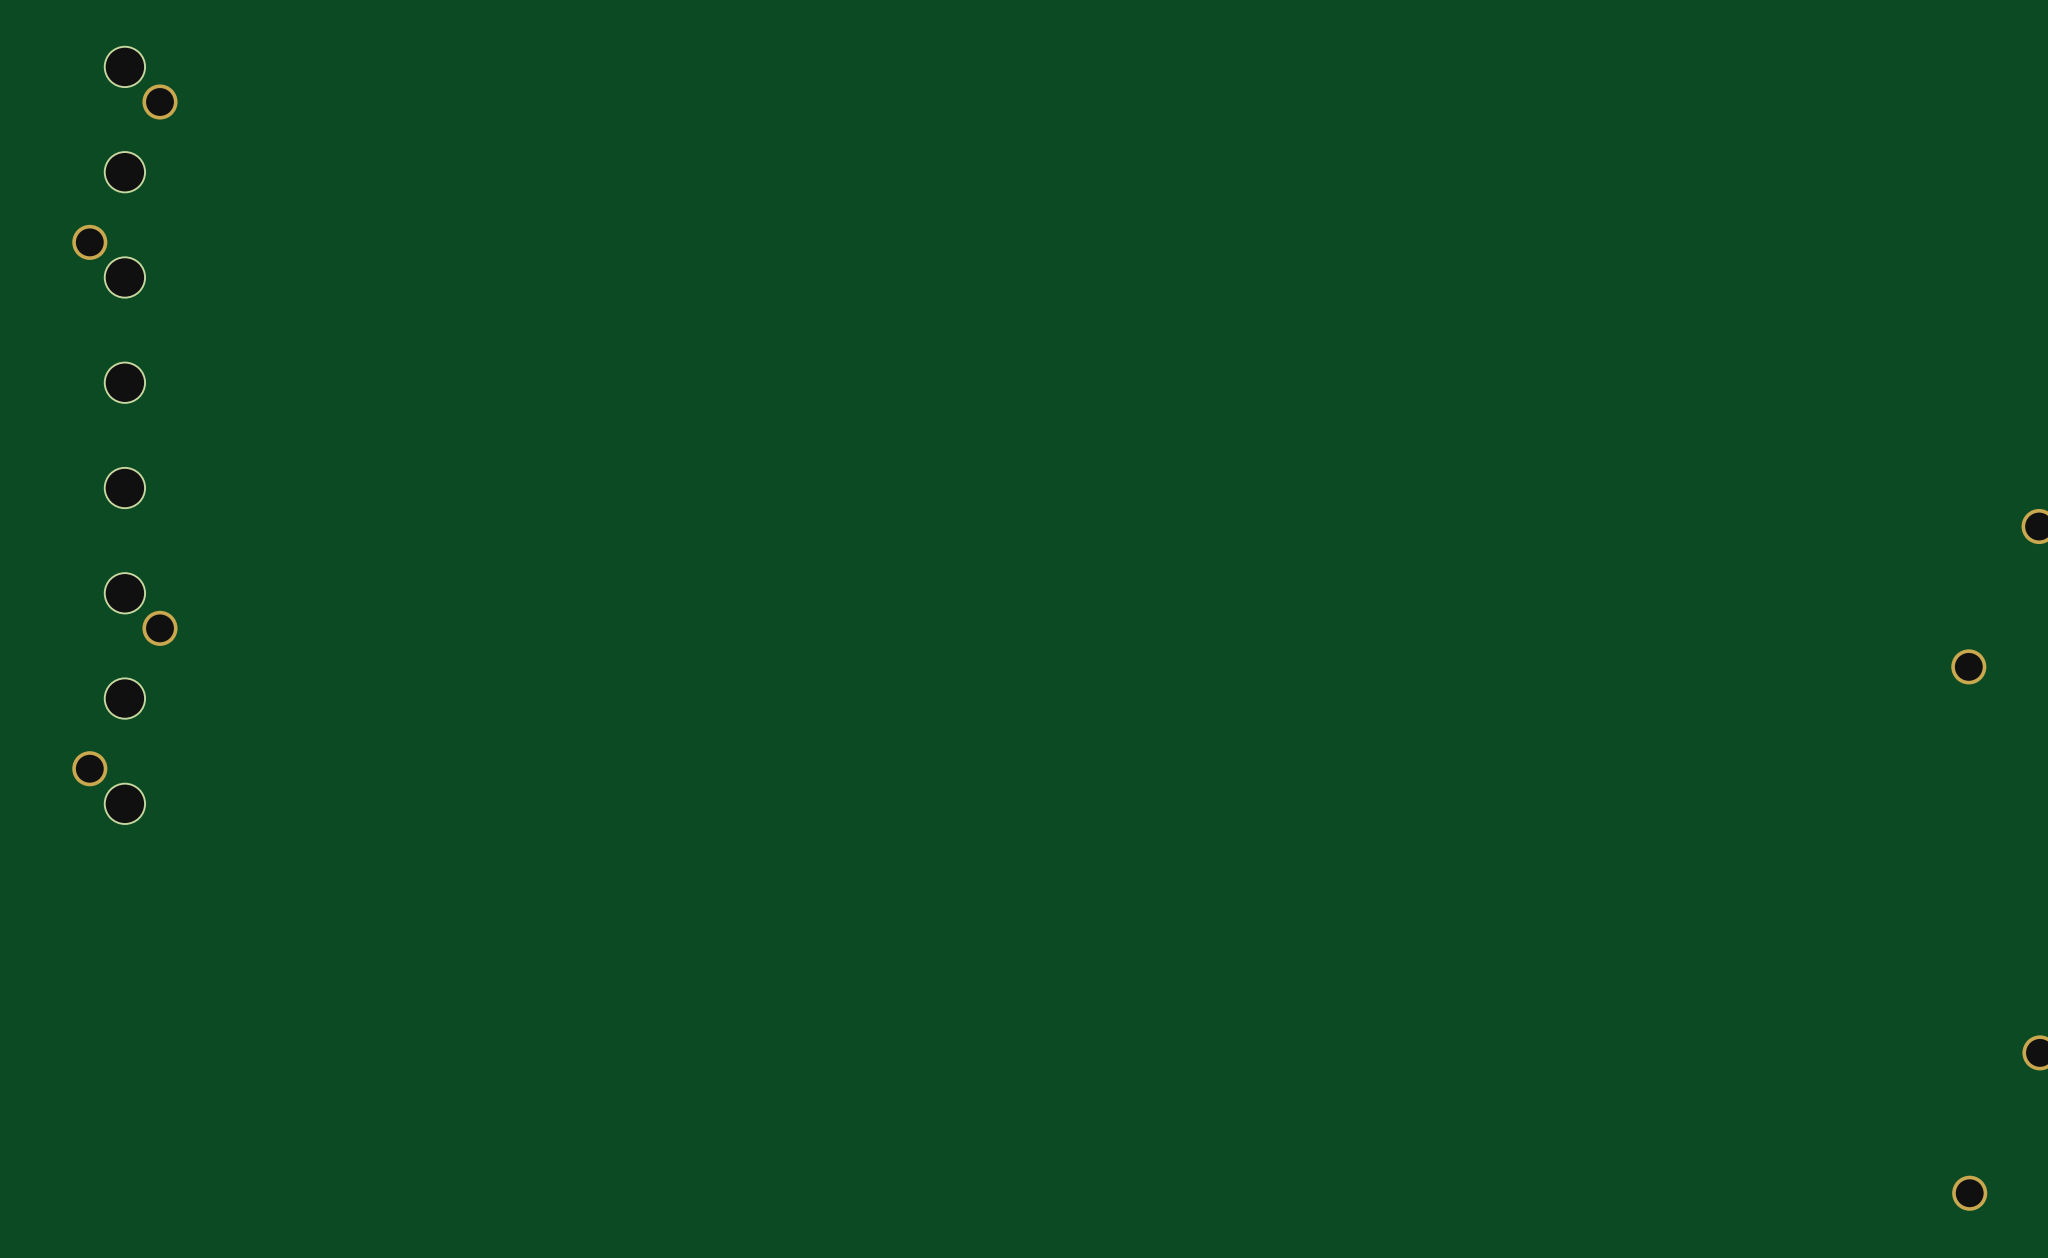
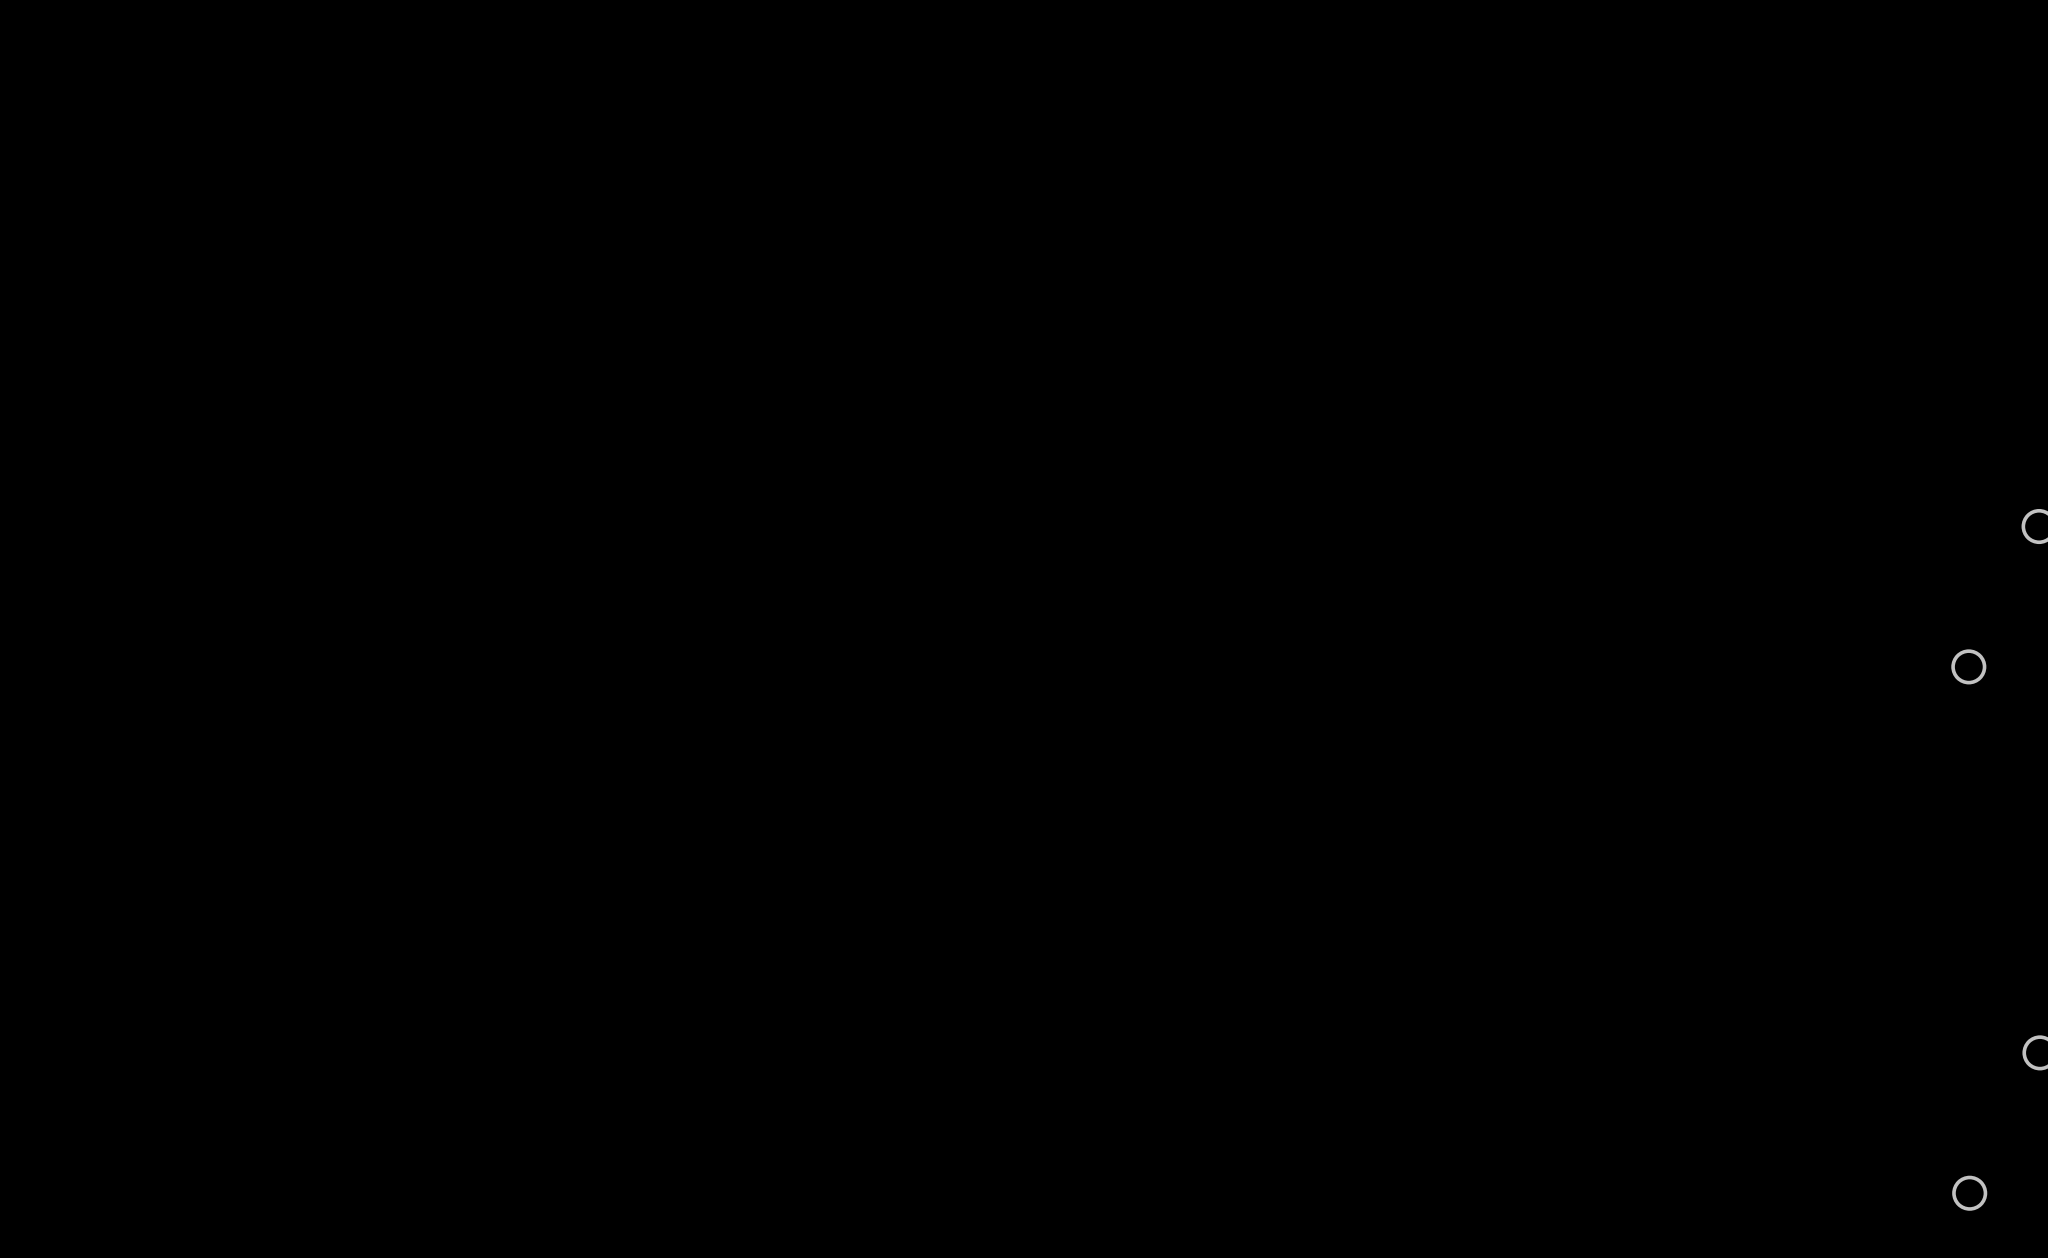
part: (124, 66) -> none
via: (159, 101) -> none
part: (124, 172) -> none
via: (89, 242) -> none
part: (124, 277) -> none
part: (124, 382) -> none
part: (124, 488) -> none
part: (124, 593) -> none
via: (159, 628) -> none
part: (124, 698) -> none
via: (89, 768) -> none
part: (124, 803) -> none

